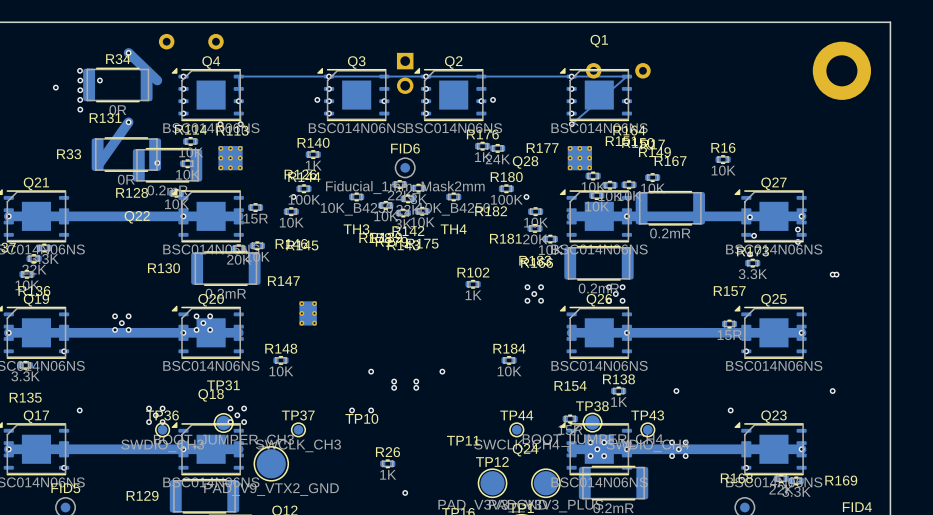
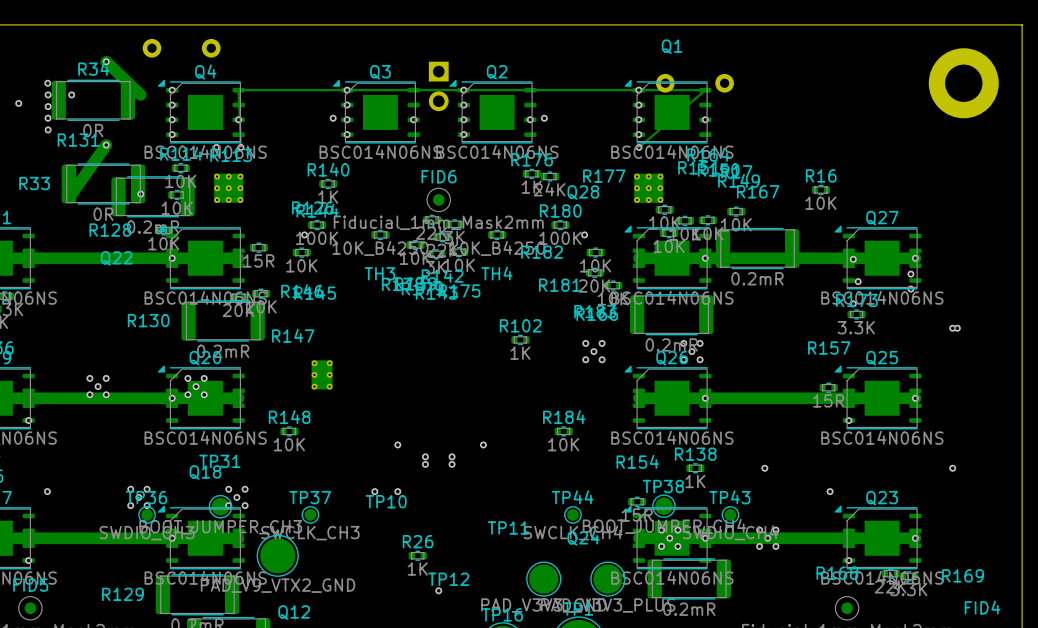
TP12 name position: TP12 (492, 461) -> TP12 (448, 579)

